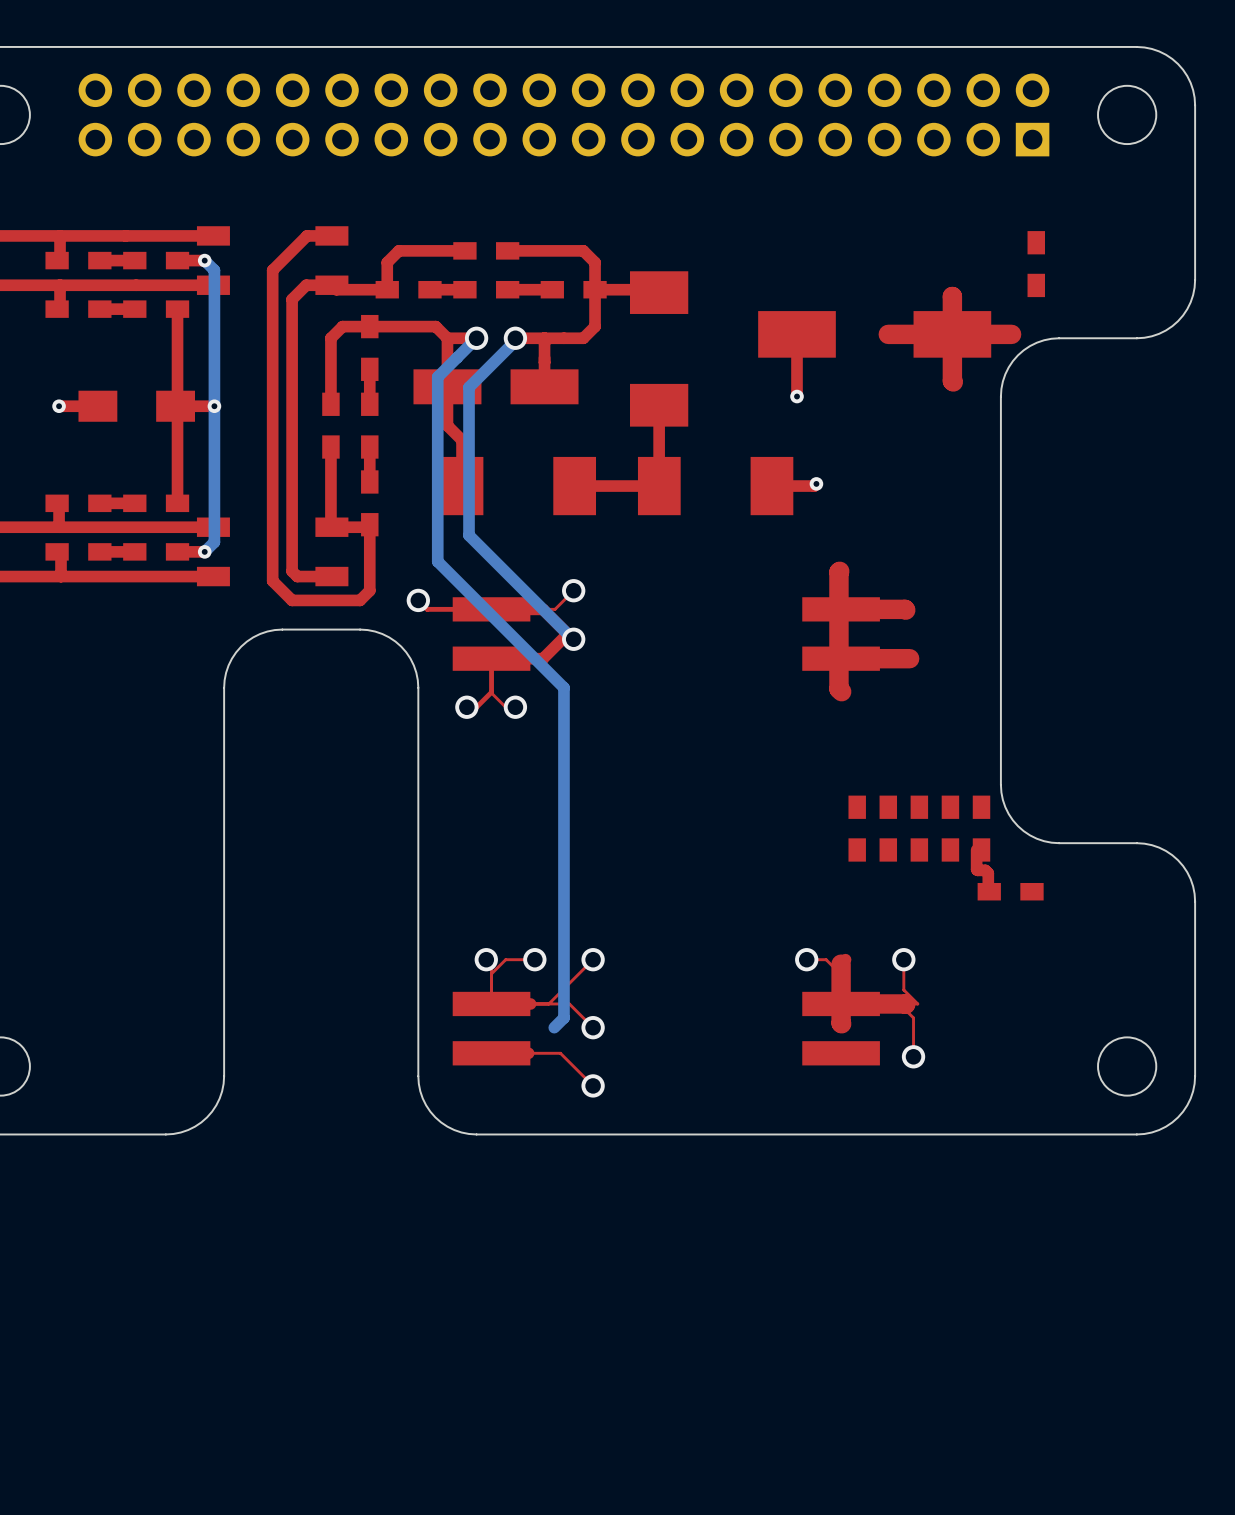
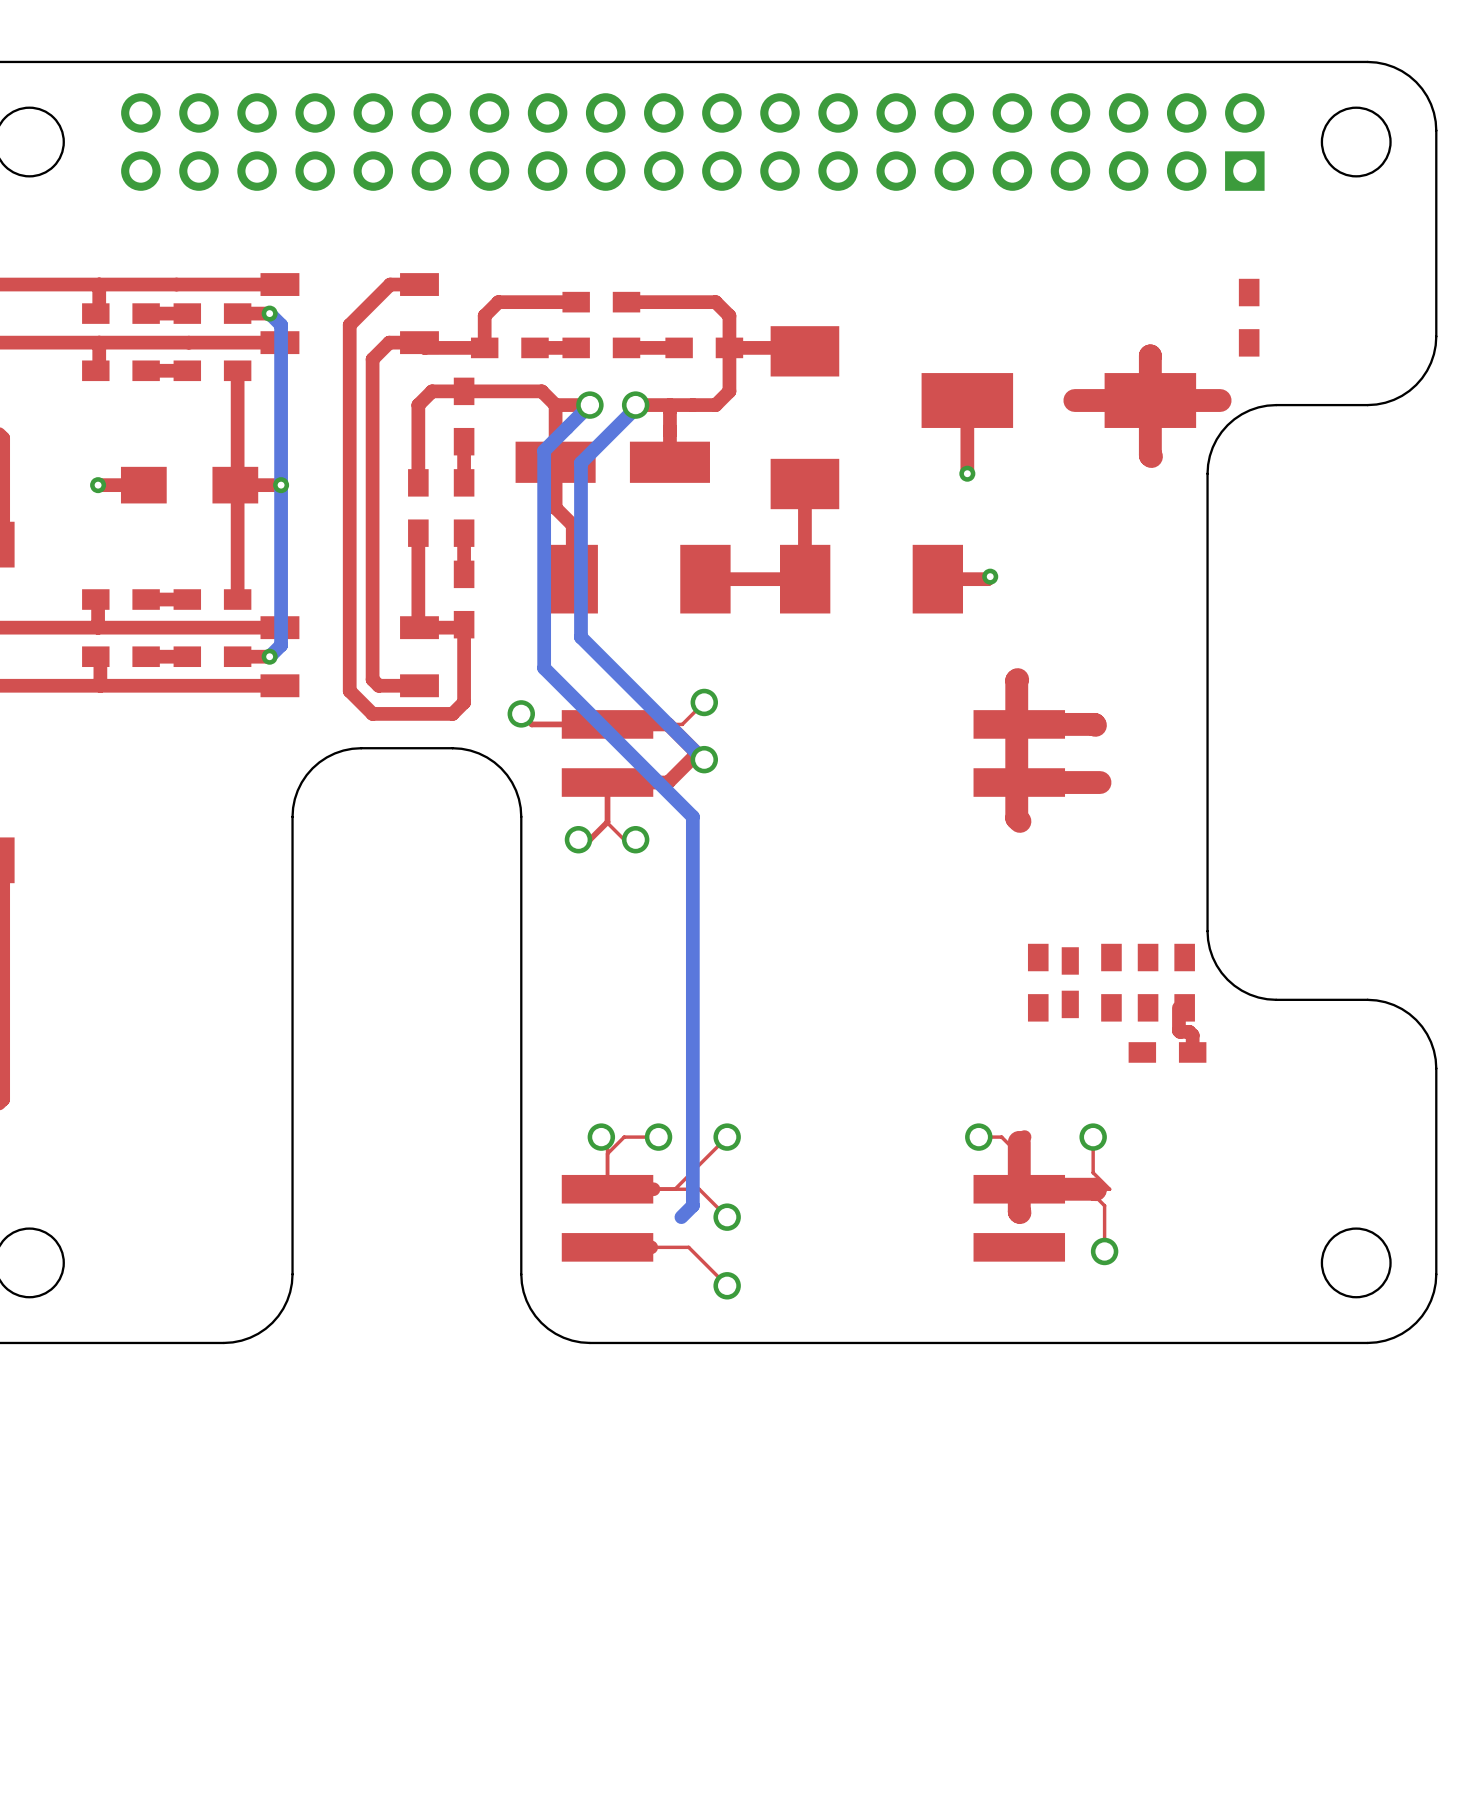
part footprint: [879, 795, 898, 862] -> [1061, 947, 1079, 1019]
part position: (1010, 891) -> (1167, 1052)

